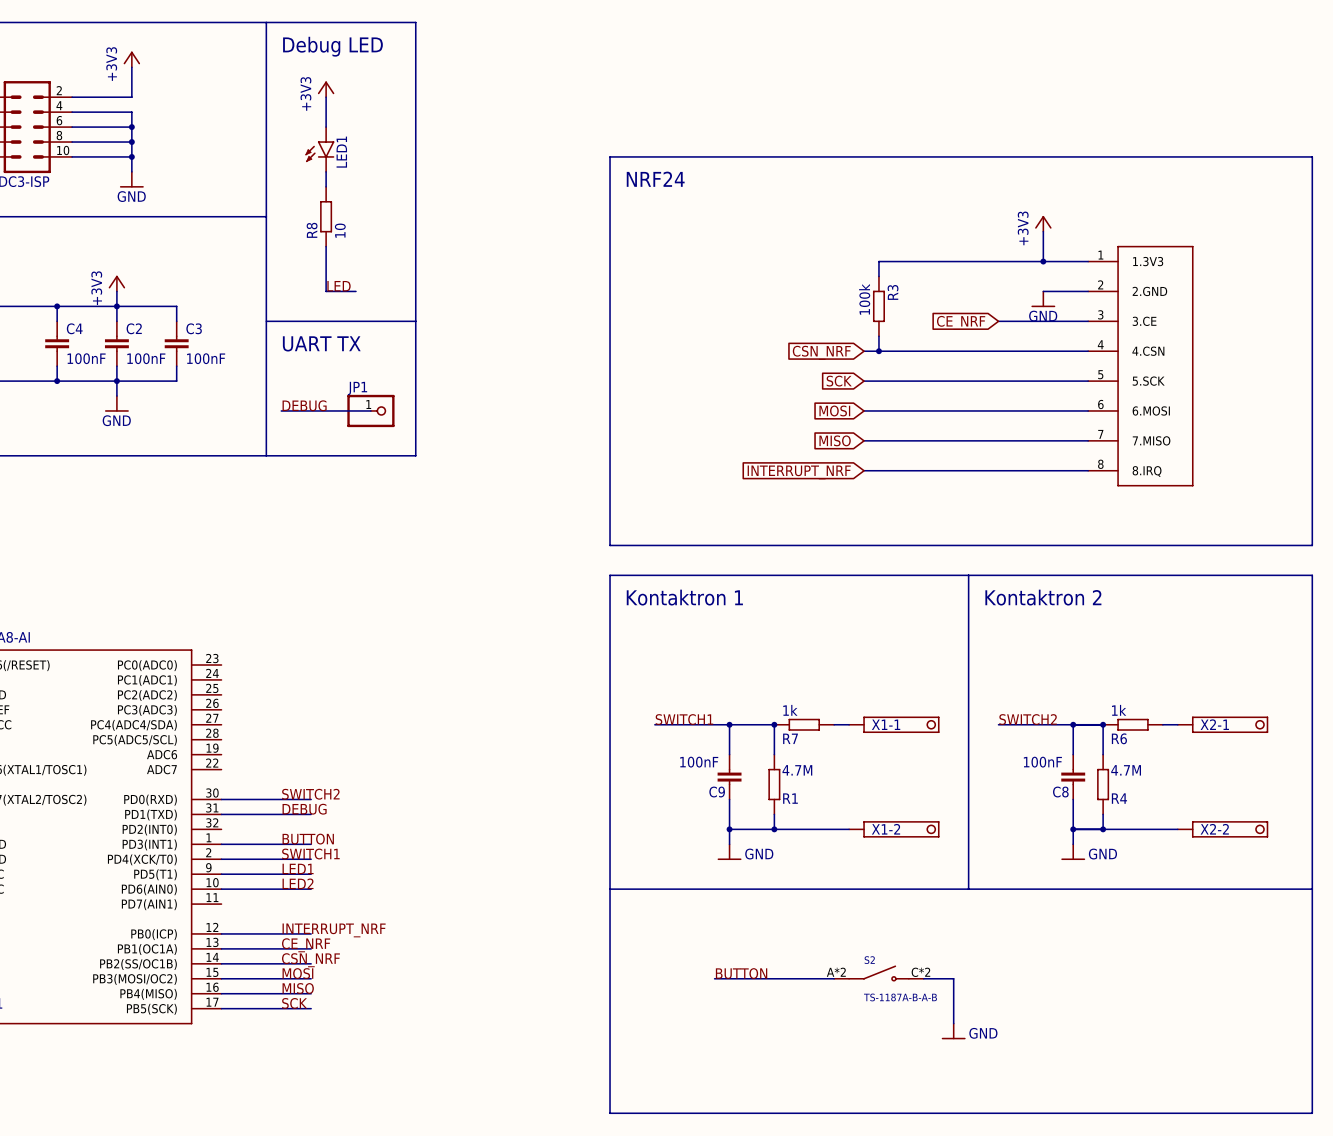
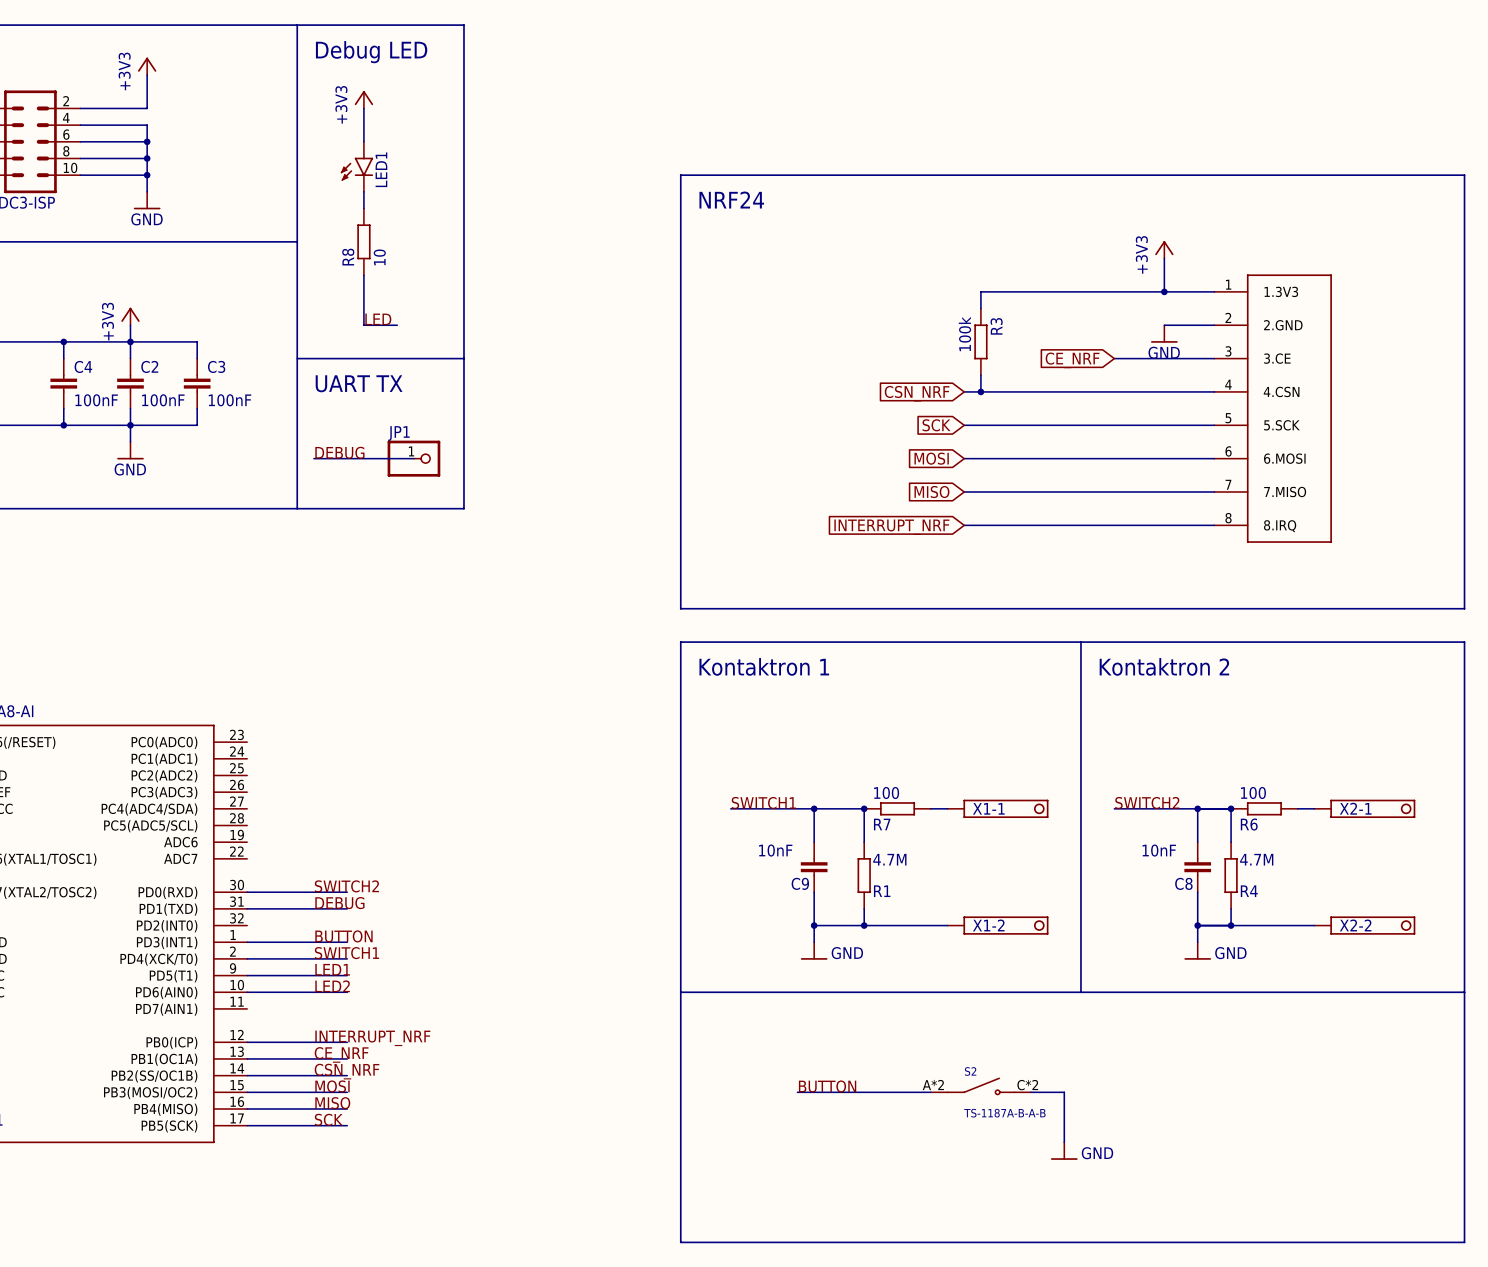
R7 value: 1k (790, 710) -> 100 (886, 793)
R6 value: 1k (1119, 710) -> 100 (1253, 793)
C9 value: 100nF (699, 762) -> 10nF (775, 850)
C8 value: 100nF (1042, 762) -> 10nF (1159, 850)

